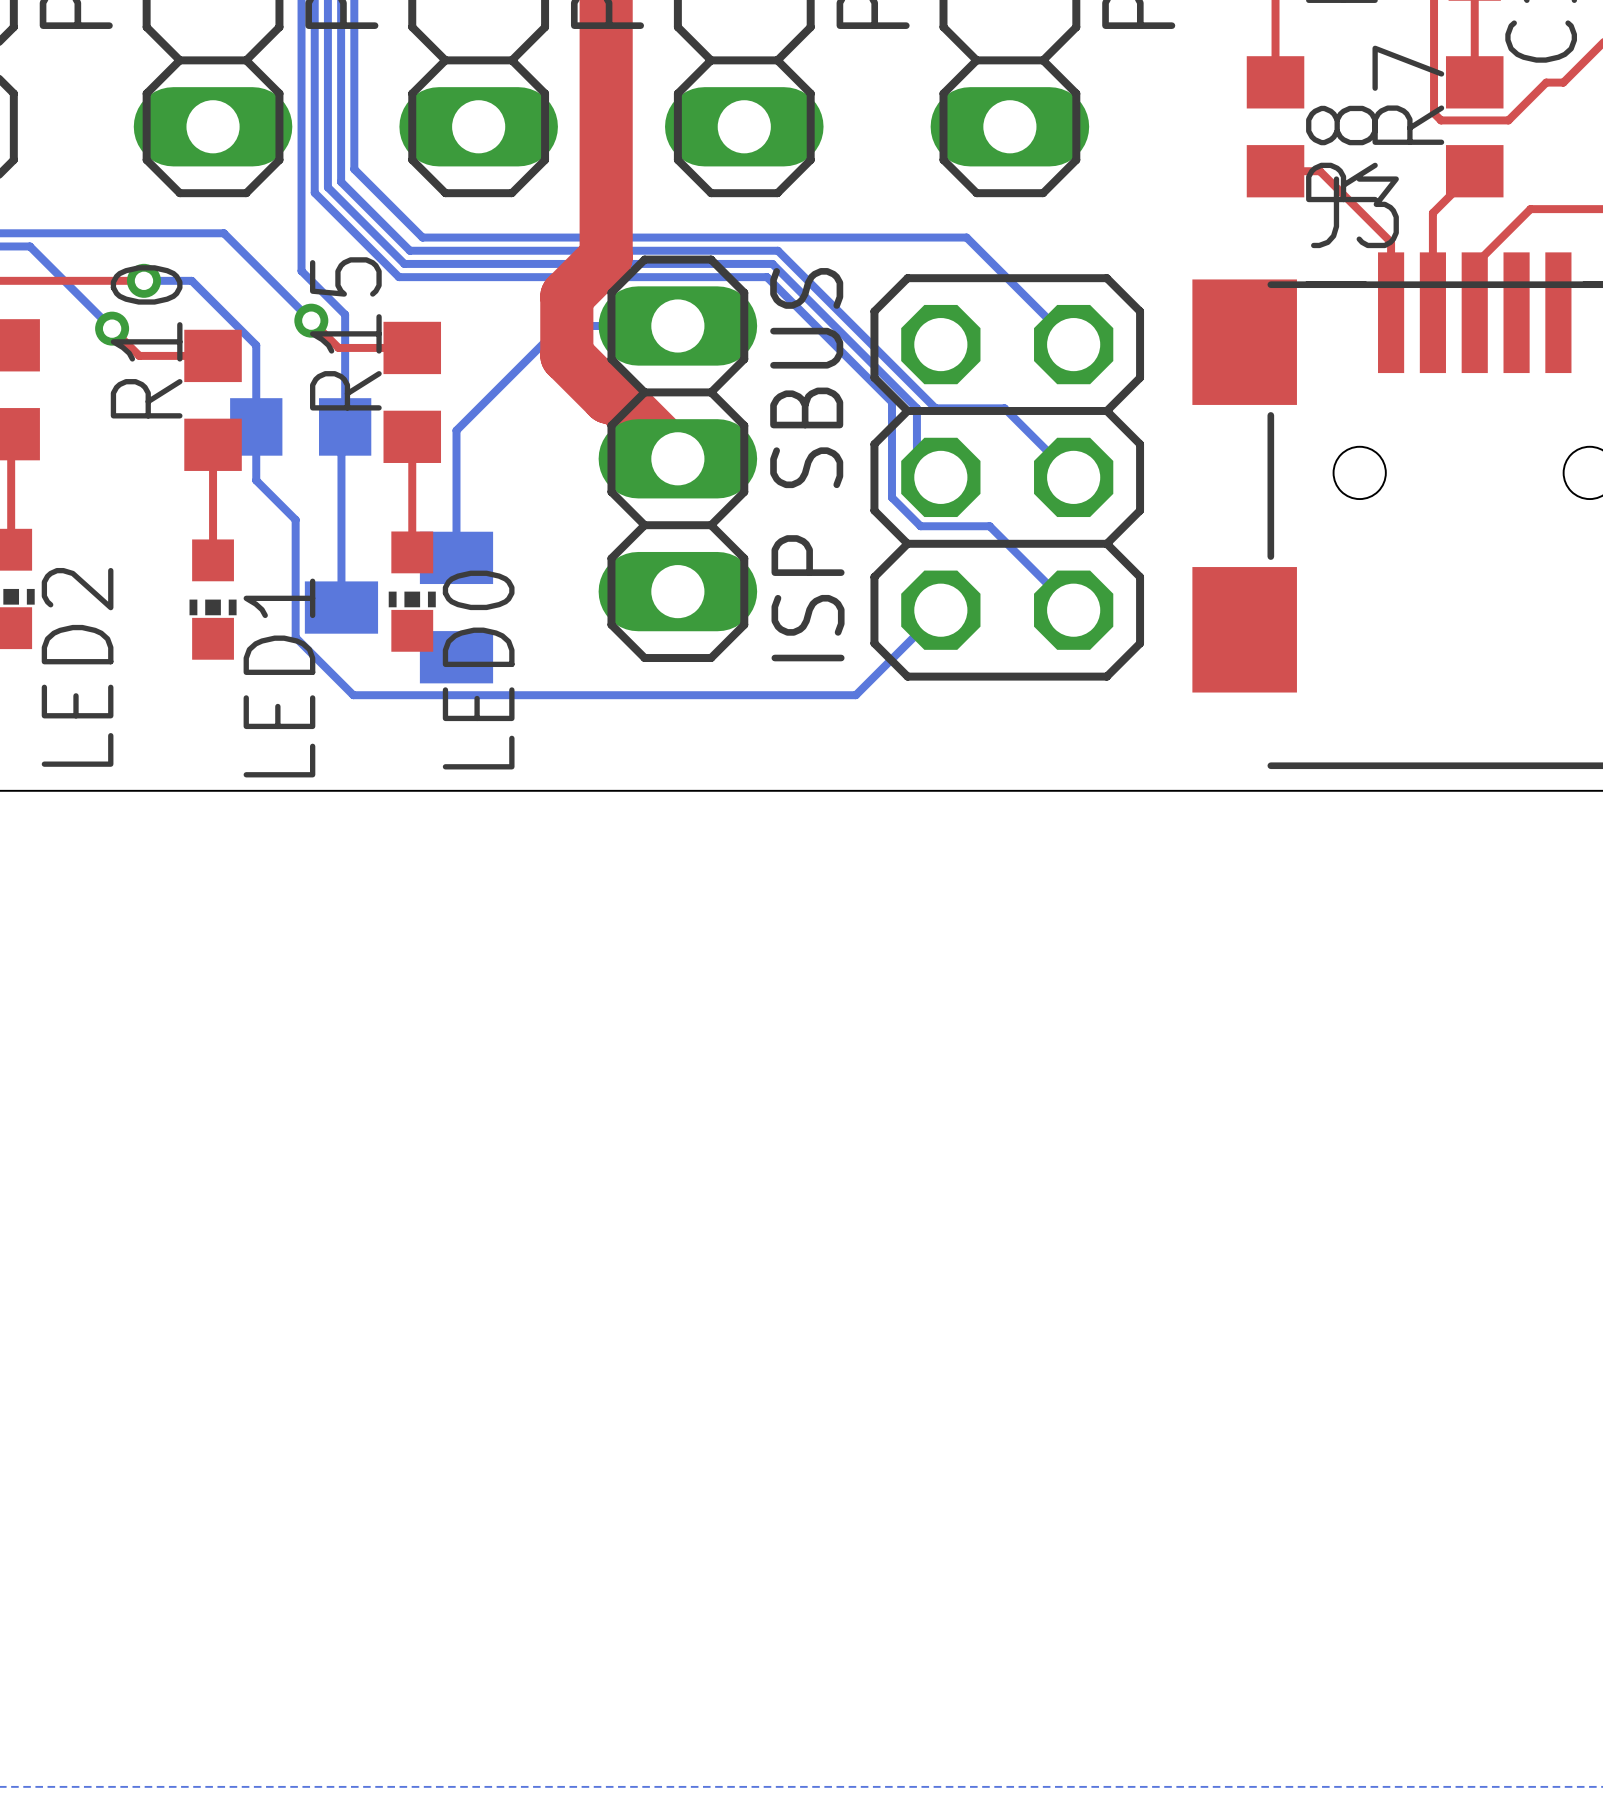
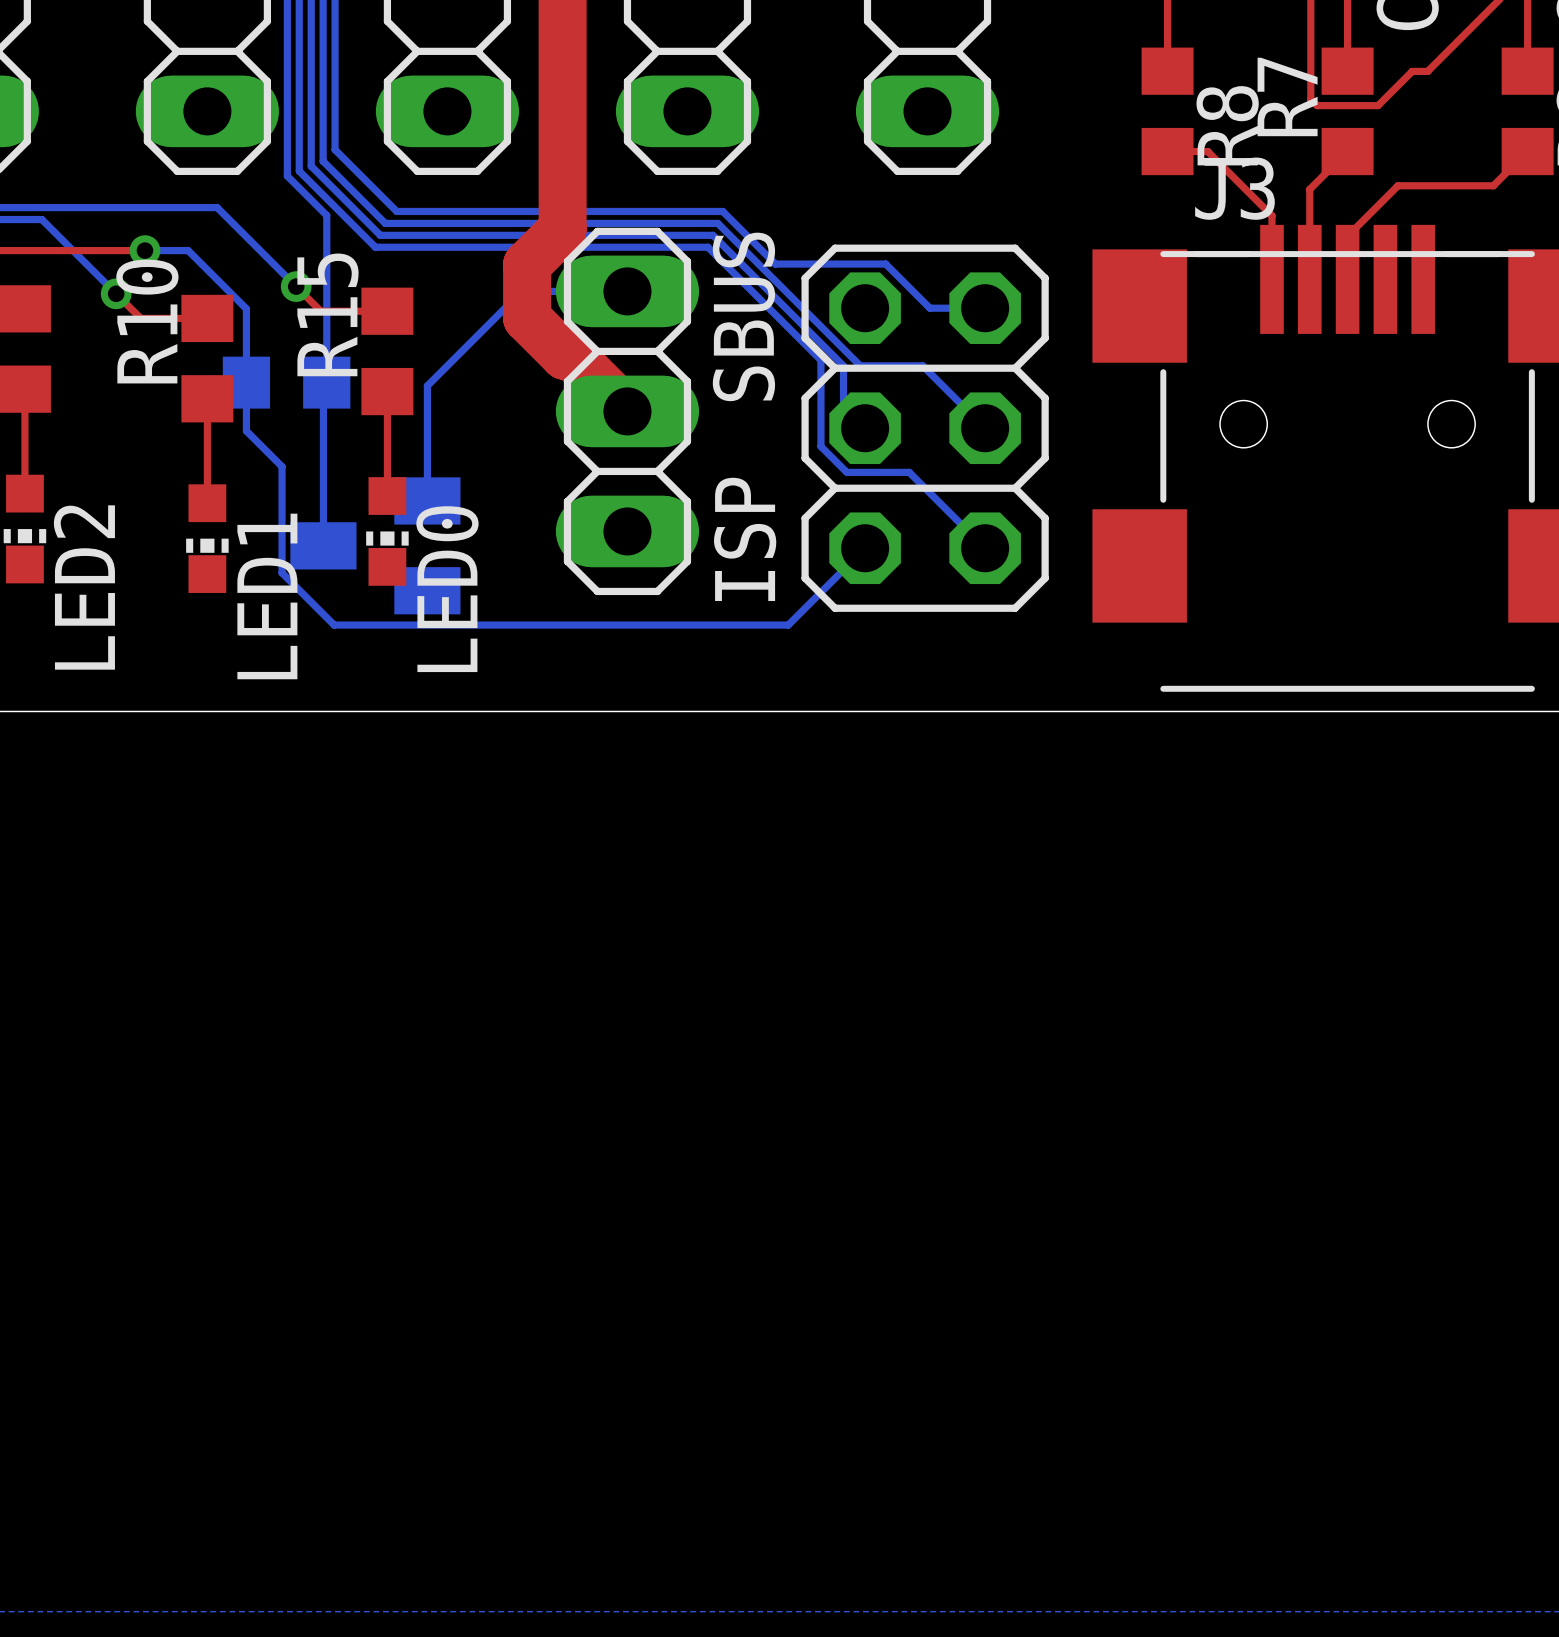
bottom track: (301, 198) (301, 271) (345, 314) -> (287, 176) (326, 215) (326, 281)
bottom track: (783, 237) (966, 237) (1073, 344) -> (722, 211) (775, 264) (885, 264) (929, 308) (985, 308)

